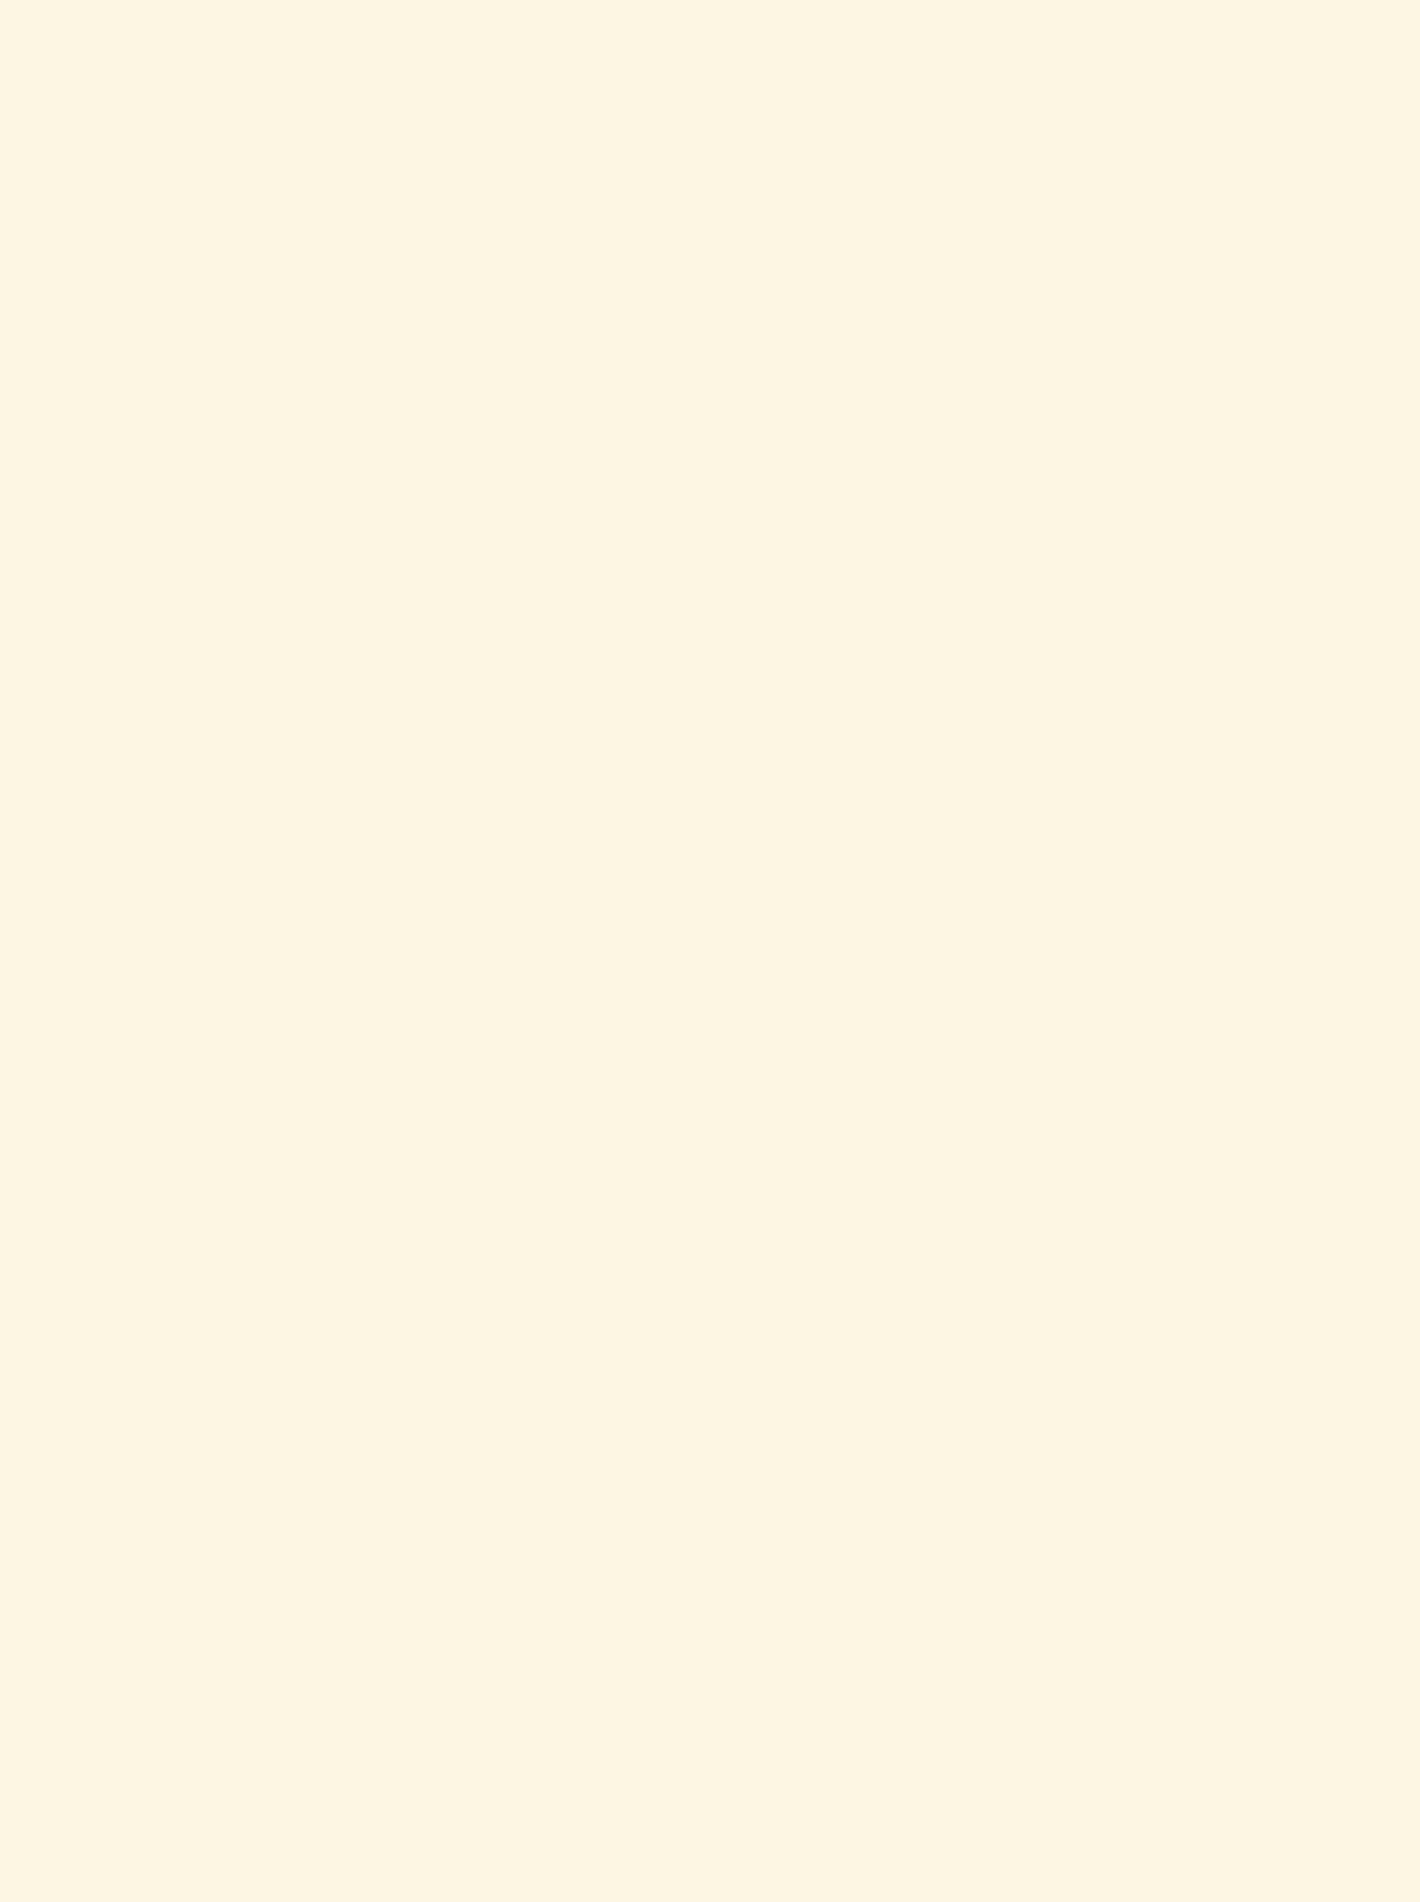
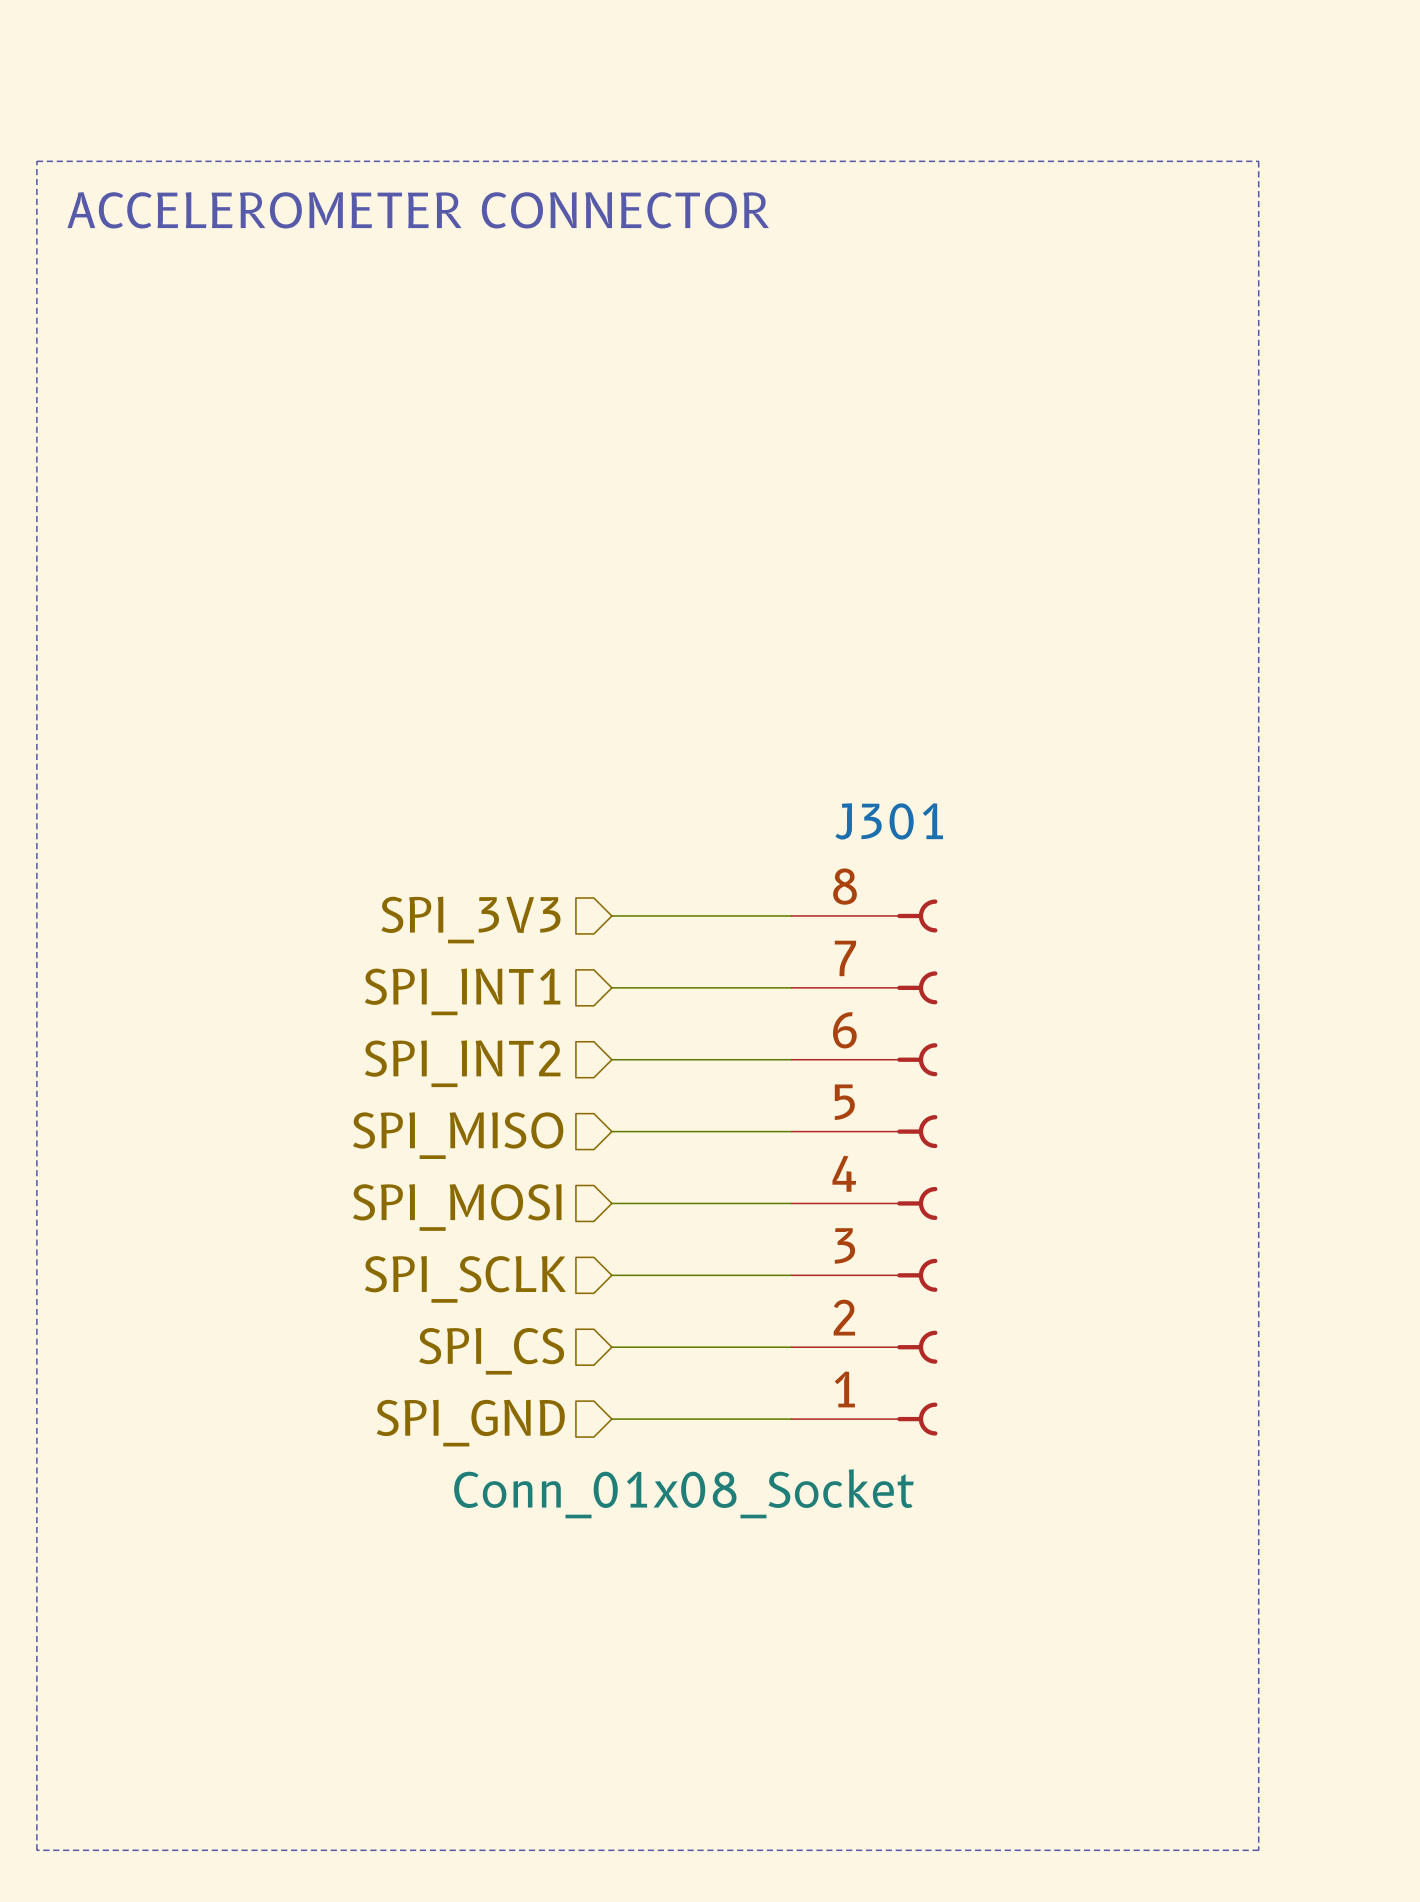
line: none -> (36, 161) (1258, 161) (1258, 1850) (36, 1850) (36, 161)
text: none -> ACCELEROMETER CONNECTOR (418, 210)
wire: none -> (611, 915) (791, 915)
hierarchical label: none -> SPI_3V3 (470, 920)
wire: none -> (611, 987) (791, 987)
hierarchical label: none -> SPI_INT1 (462, 991)
wire: none -> (611, 1059) (791, 1059)
hierarchical label: none -> SPI_INT2 (462, 1063)
wire: none -> (611, 1131) (791, 1131)
hierarchical label: none -> SPI_MISO (458, 1135)
J301: none -> Conn_01x08_Socket (864, 1167)
wire: none -> (611, 1203) (791, 1203)
hierarchical label: none -> SPI_MOSI (457, 1207)
wire: none -> (611, 1275) (791, 1275)
hierarchical label: none -> SPI_SCLK (465, 1279)
wire: none -> (611, 1347) (791, 1347)
hierarchical label: none -> SPI_CS (491, 1351)
wire: none -> (611, 1419) (791, 1419)
hierarchical label: none -> SPI_GND (470, 1423)

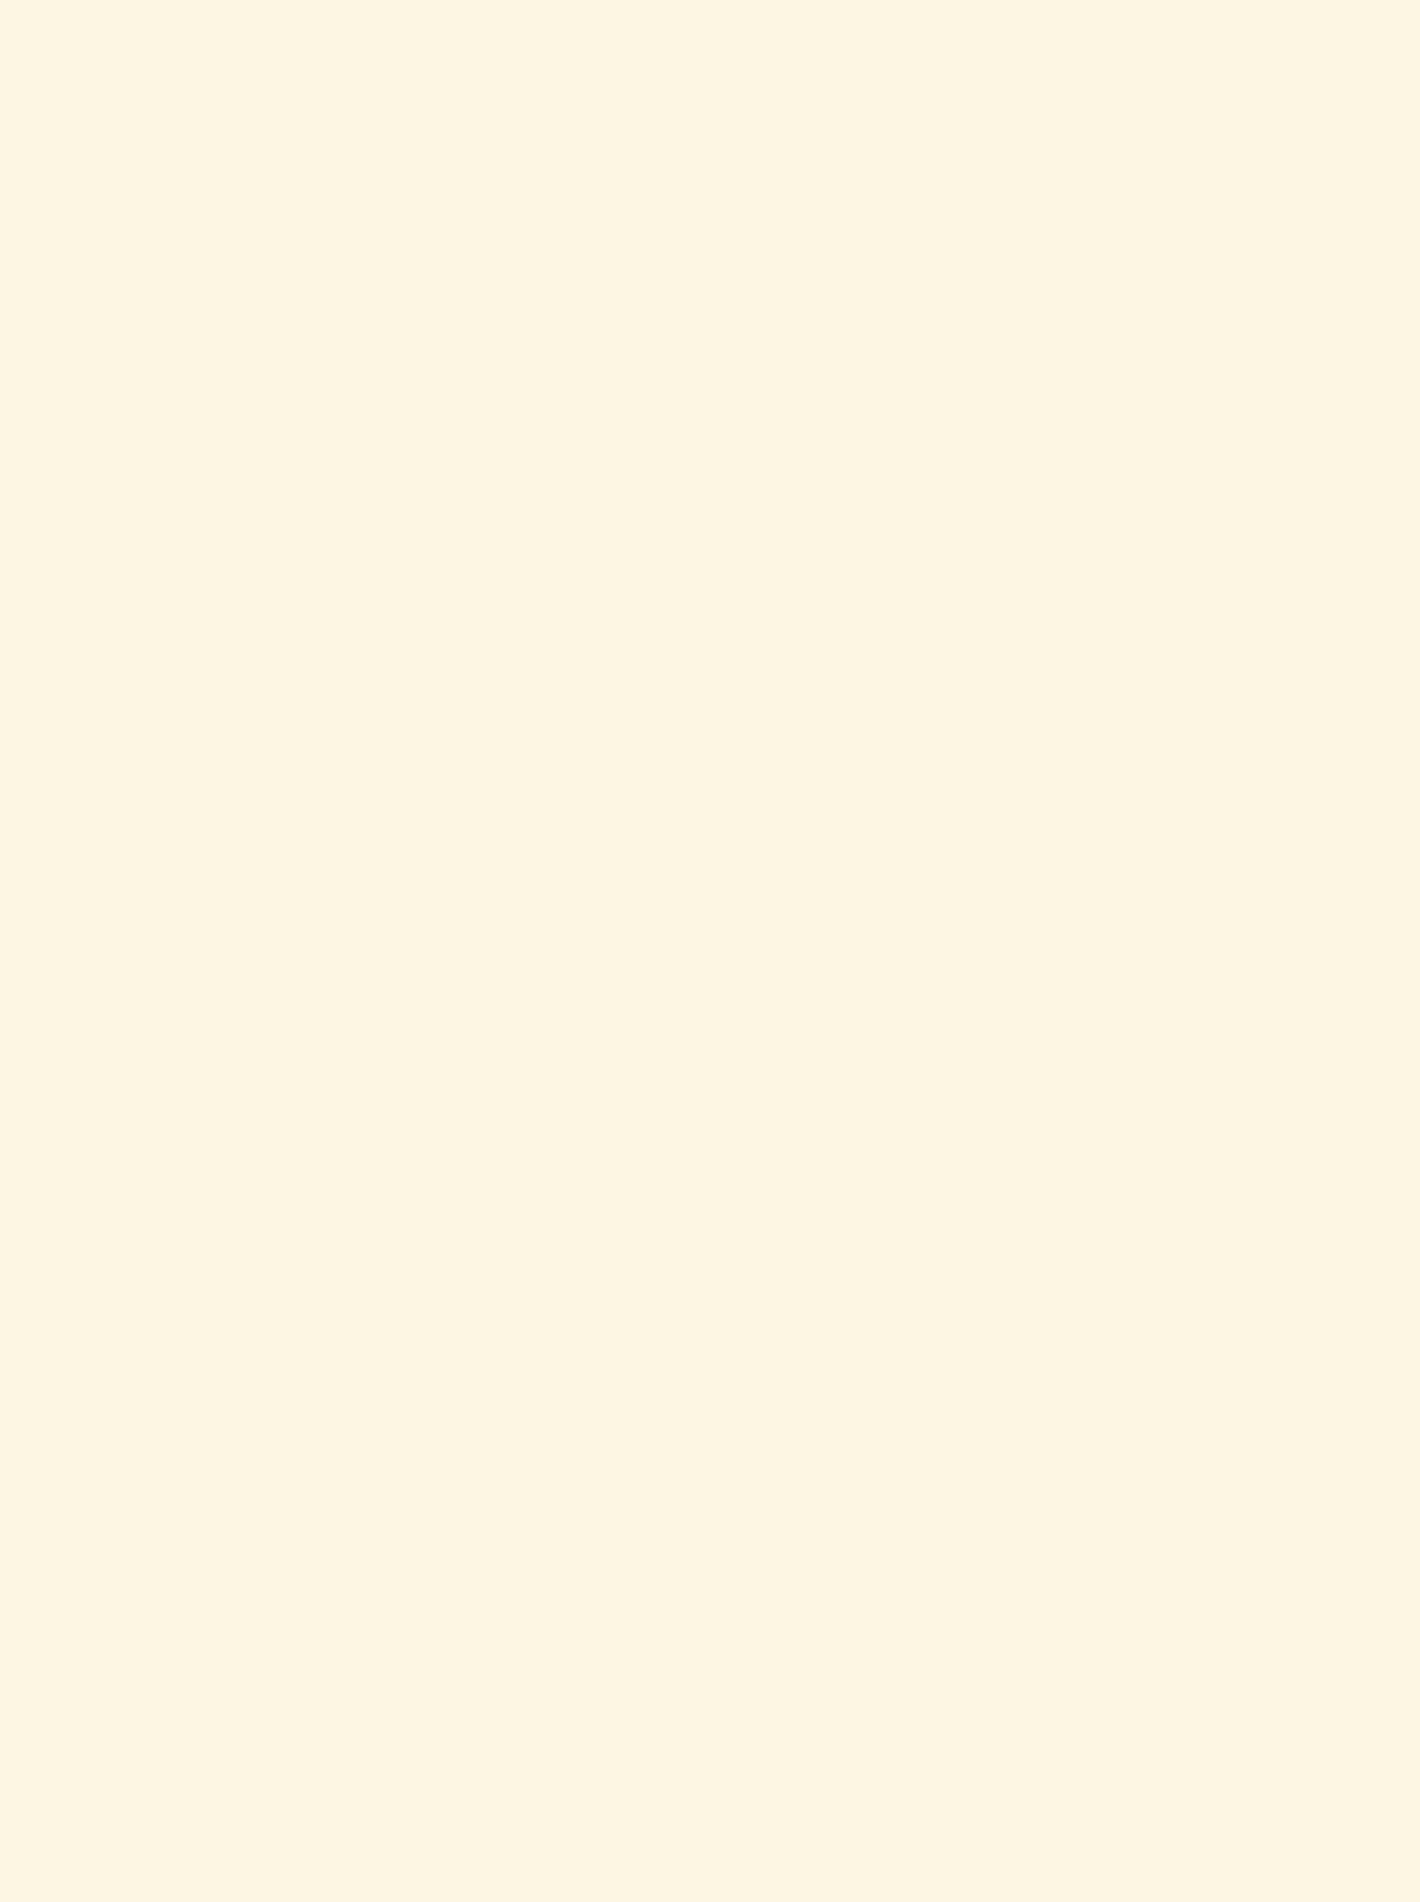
line: (36, 161) (1258, 161) (1258, 1850) (36, 1850) (36, 161) -> none
text: ACCELEROMETER CONNECTOR (418, 210) -> none
wire: (611, 915) (791, 915) -> none
hierarchical label: SPI_3V3 (470, 920) -> none
wire: (611, 987) (791, 987) -> none
hierarchical label: SPI_INT1 (462, 991) -> none
wire: (611, 1059) (791, 1059) -> none
hierarchical label: SPI_INT2 (462, 1063) -> none
wire: (611, 1131) (791, 1131) -> none
hierarchical label: SPI_MISO (458, 1135) -> none
J301: Conn_01x08_Socket (864, 1167) -> none
wire: (611, 1203) (791, 1203) -> none
hierarchical label: SPI_MOSI (457, 1207) -> none
wire: (611, 1275) (791, 1275) -> none
hierarchical label: SPI_SCLK (465, 1279) -> none
wire: (611, 1347) (791, 1347) -> none
hierarchical label: SPI_CS (491, 1351) -> none
wire: (611, 1419) (791, 1419) -> none
hierarchical label: SPI_GND (470, 1423) -> none

